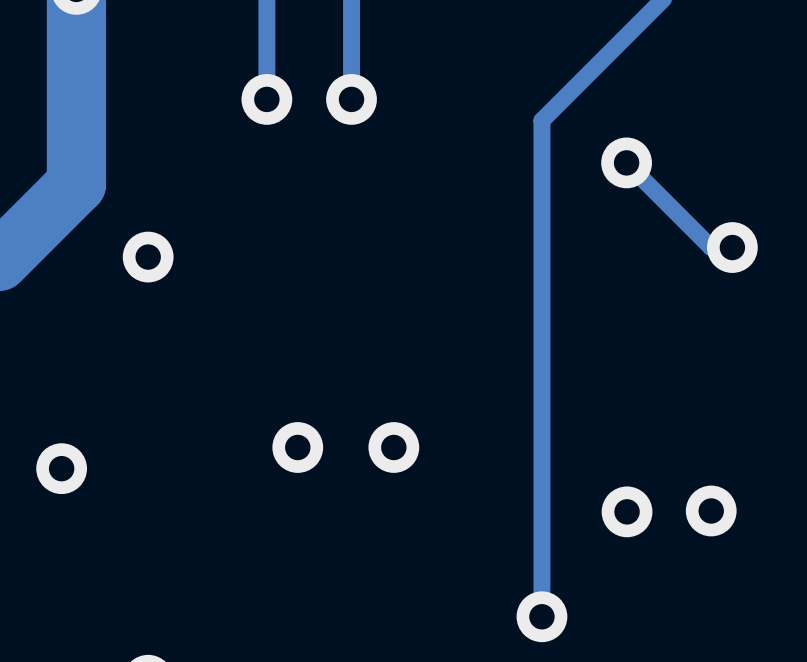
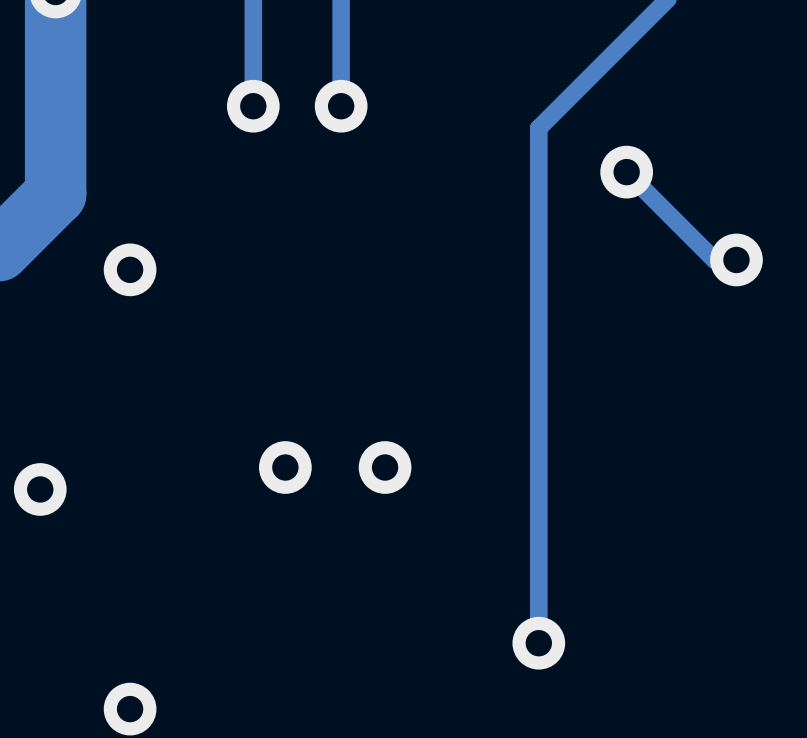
via: (711, 510) -> none
via: (627, 511) -> none

